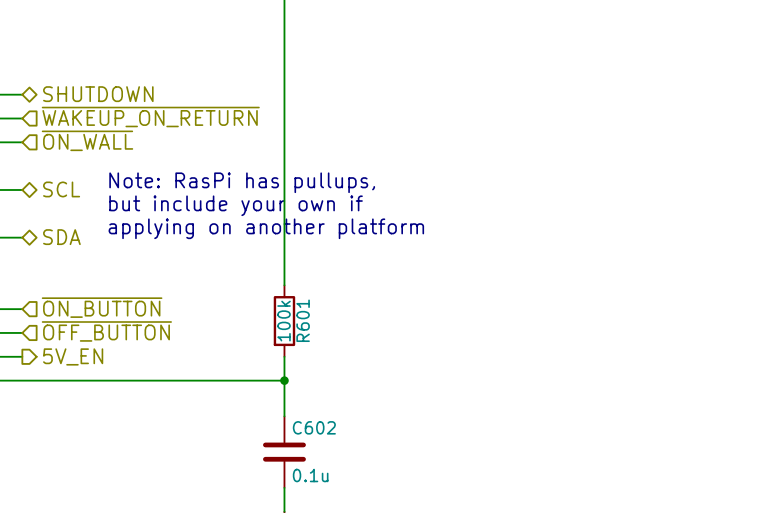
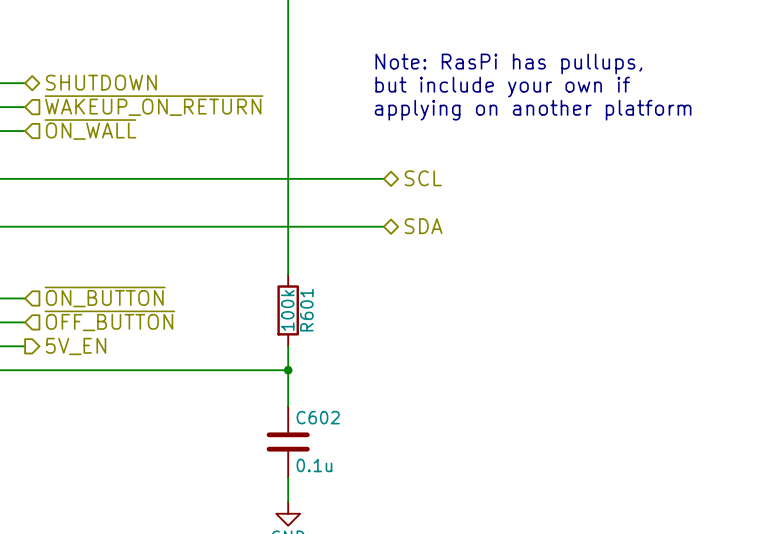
text: none -> Note: RasPi has pullups, (508, 63)
text: none -> but include your own if (502, 87)
text: none -> applying on another platform (533, 110)
text: Note: RasPi has pullups, (242, 182) -> none
wire: none -> (25, 178) (383, 178)
hierarchical label: SCL (61, 189) -> none
hierarchical label: none -> SCL (423, 178)
text: but include your own if (236, 205) -> none
text: applying on another platform (266, 228) -> none
wire: none -> (25, 226) (383, 226)
hierarchical label: SDA (61, 237) -> none
hierarchical label: none -> SDA (423, 226)

